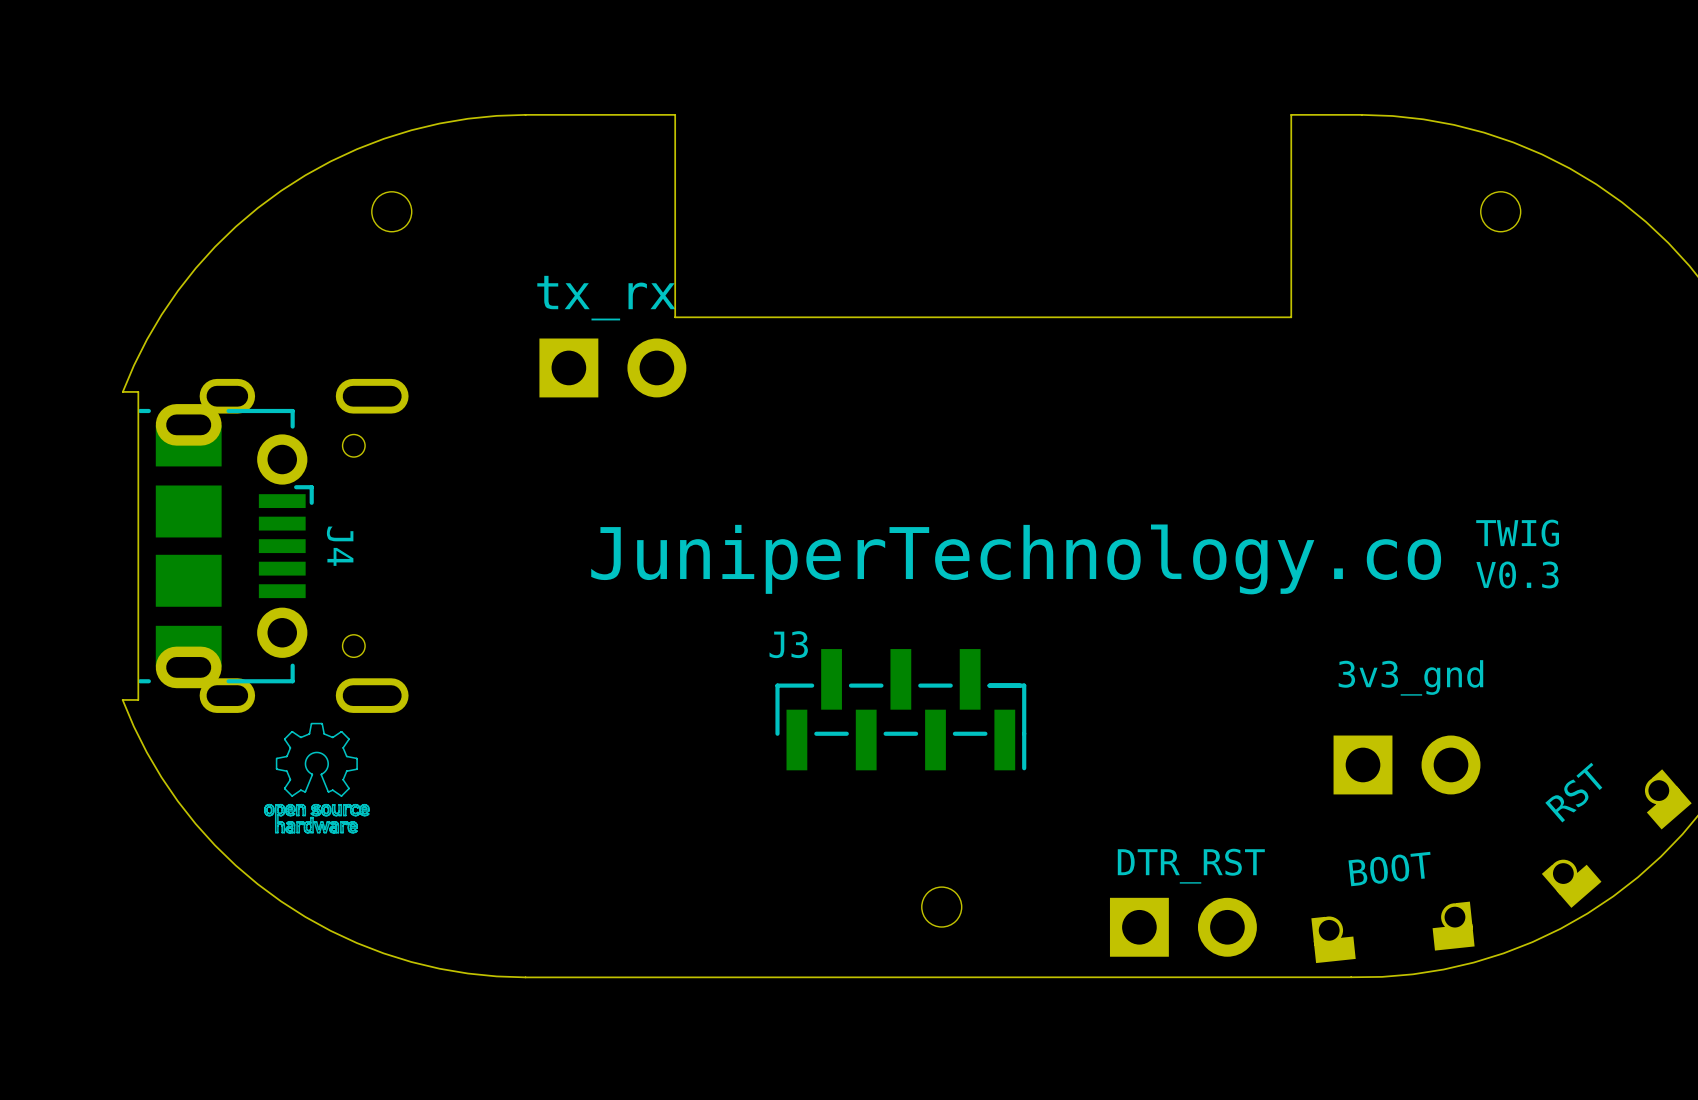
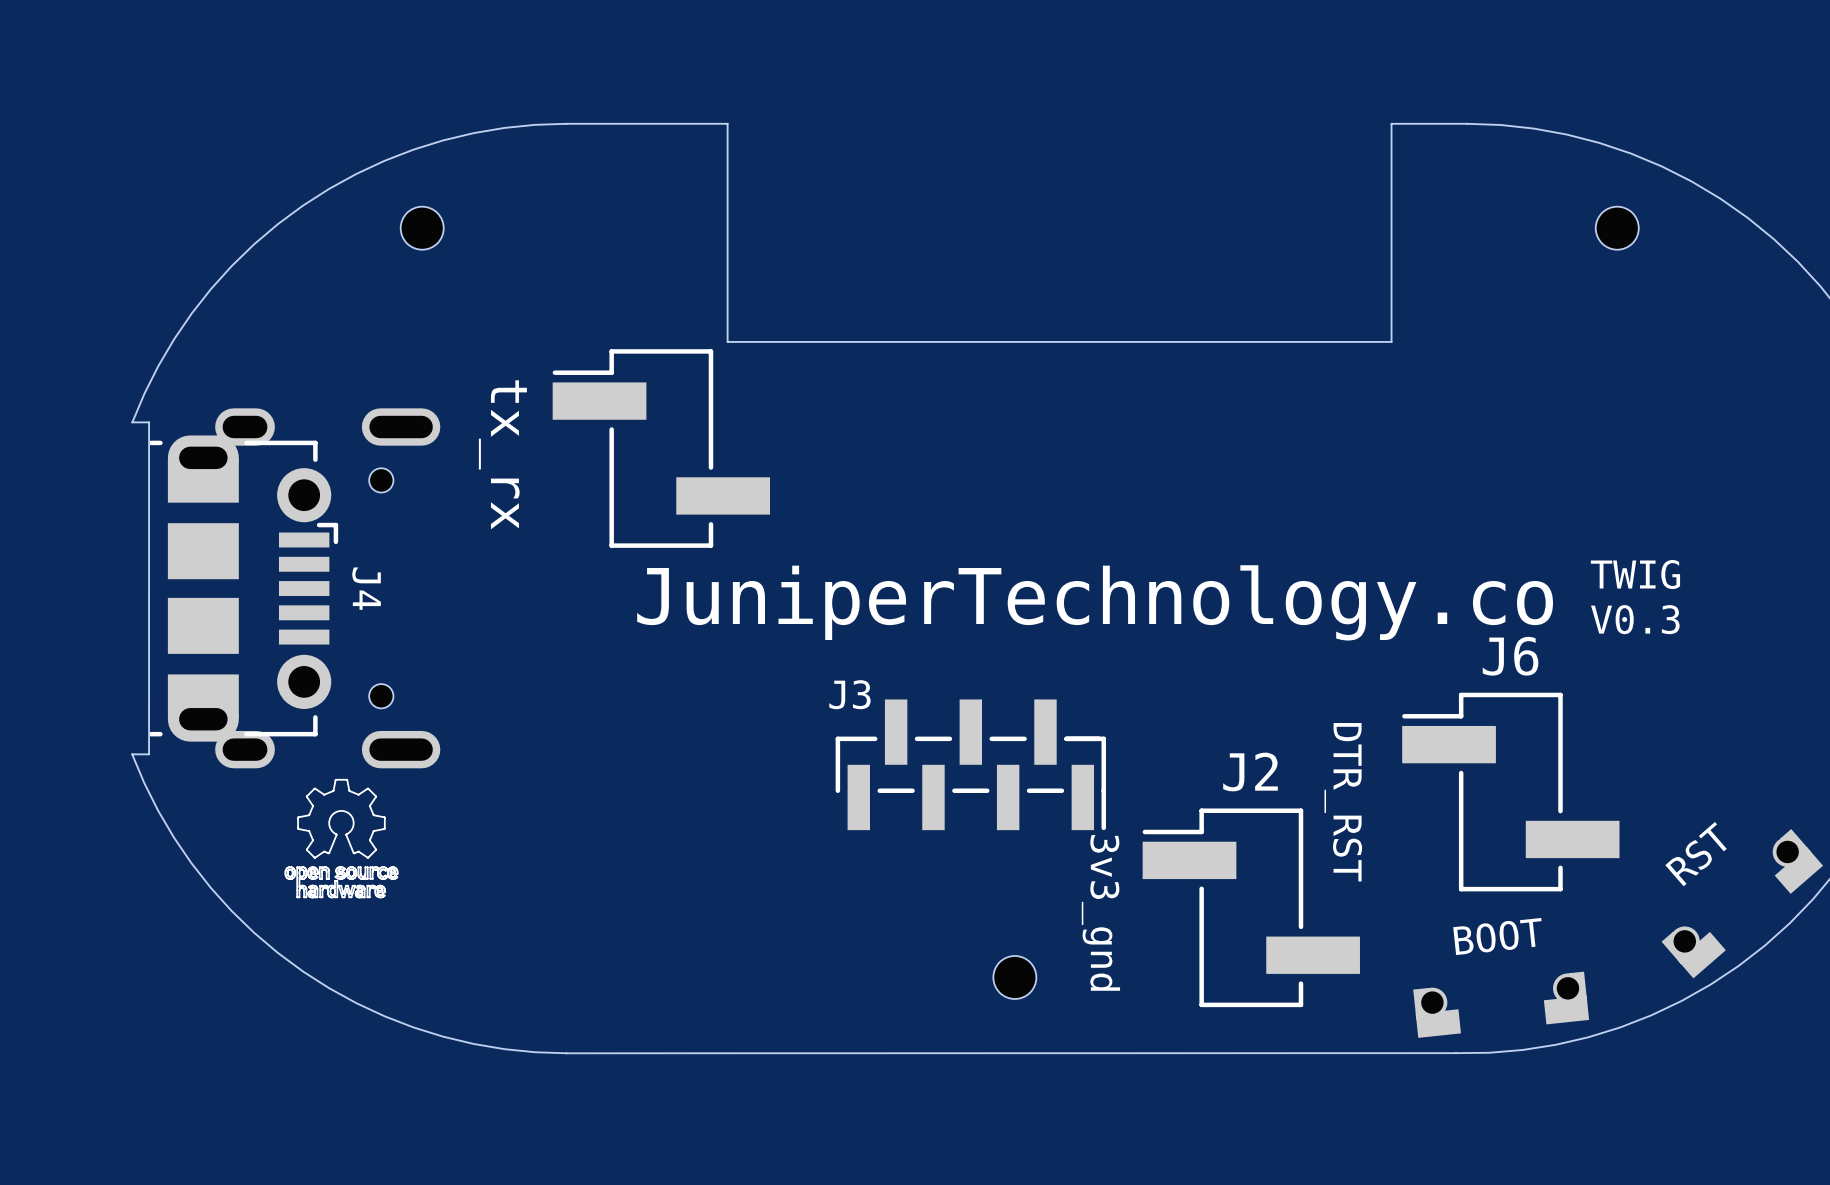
text rotation: 0° (606, 298) -> 90° clockwise (502, 454)
text position: tx_rx (606, 298) -> tx_rx (502, 454)
part: (612, 367) -> none
part: none -> (661, 448)
text rotation: 0° (1410, 677) -> 90° clockwise (1100, 912)
text position: 3v3_gnd (1410, 677) -> 3v3_gnd (1100, 912)
J6: none -> (1510, 792)
part: (1407, 764) -> none
J2: none -> (1251, 907)
text rotation: 0° (1191, 866) -> 90° clockwise (1343, 802)
part: (1183, 927) -> none

